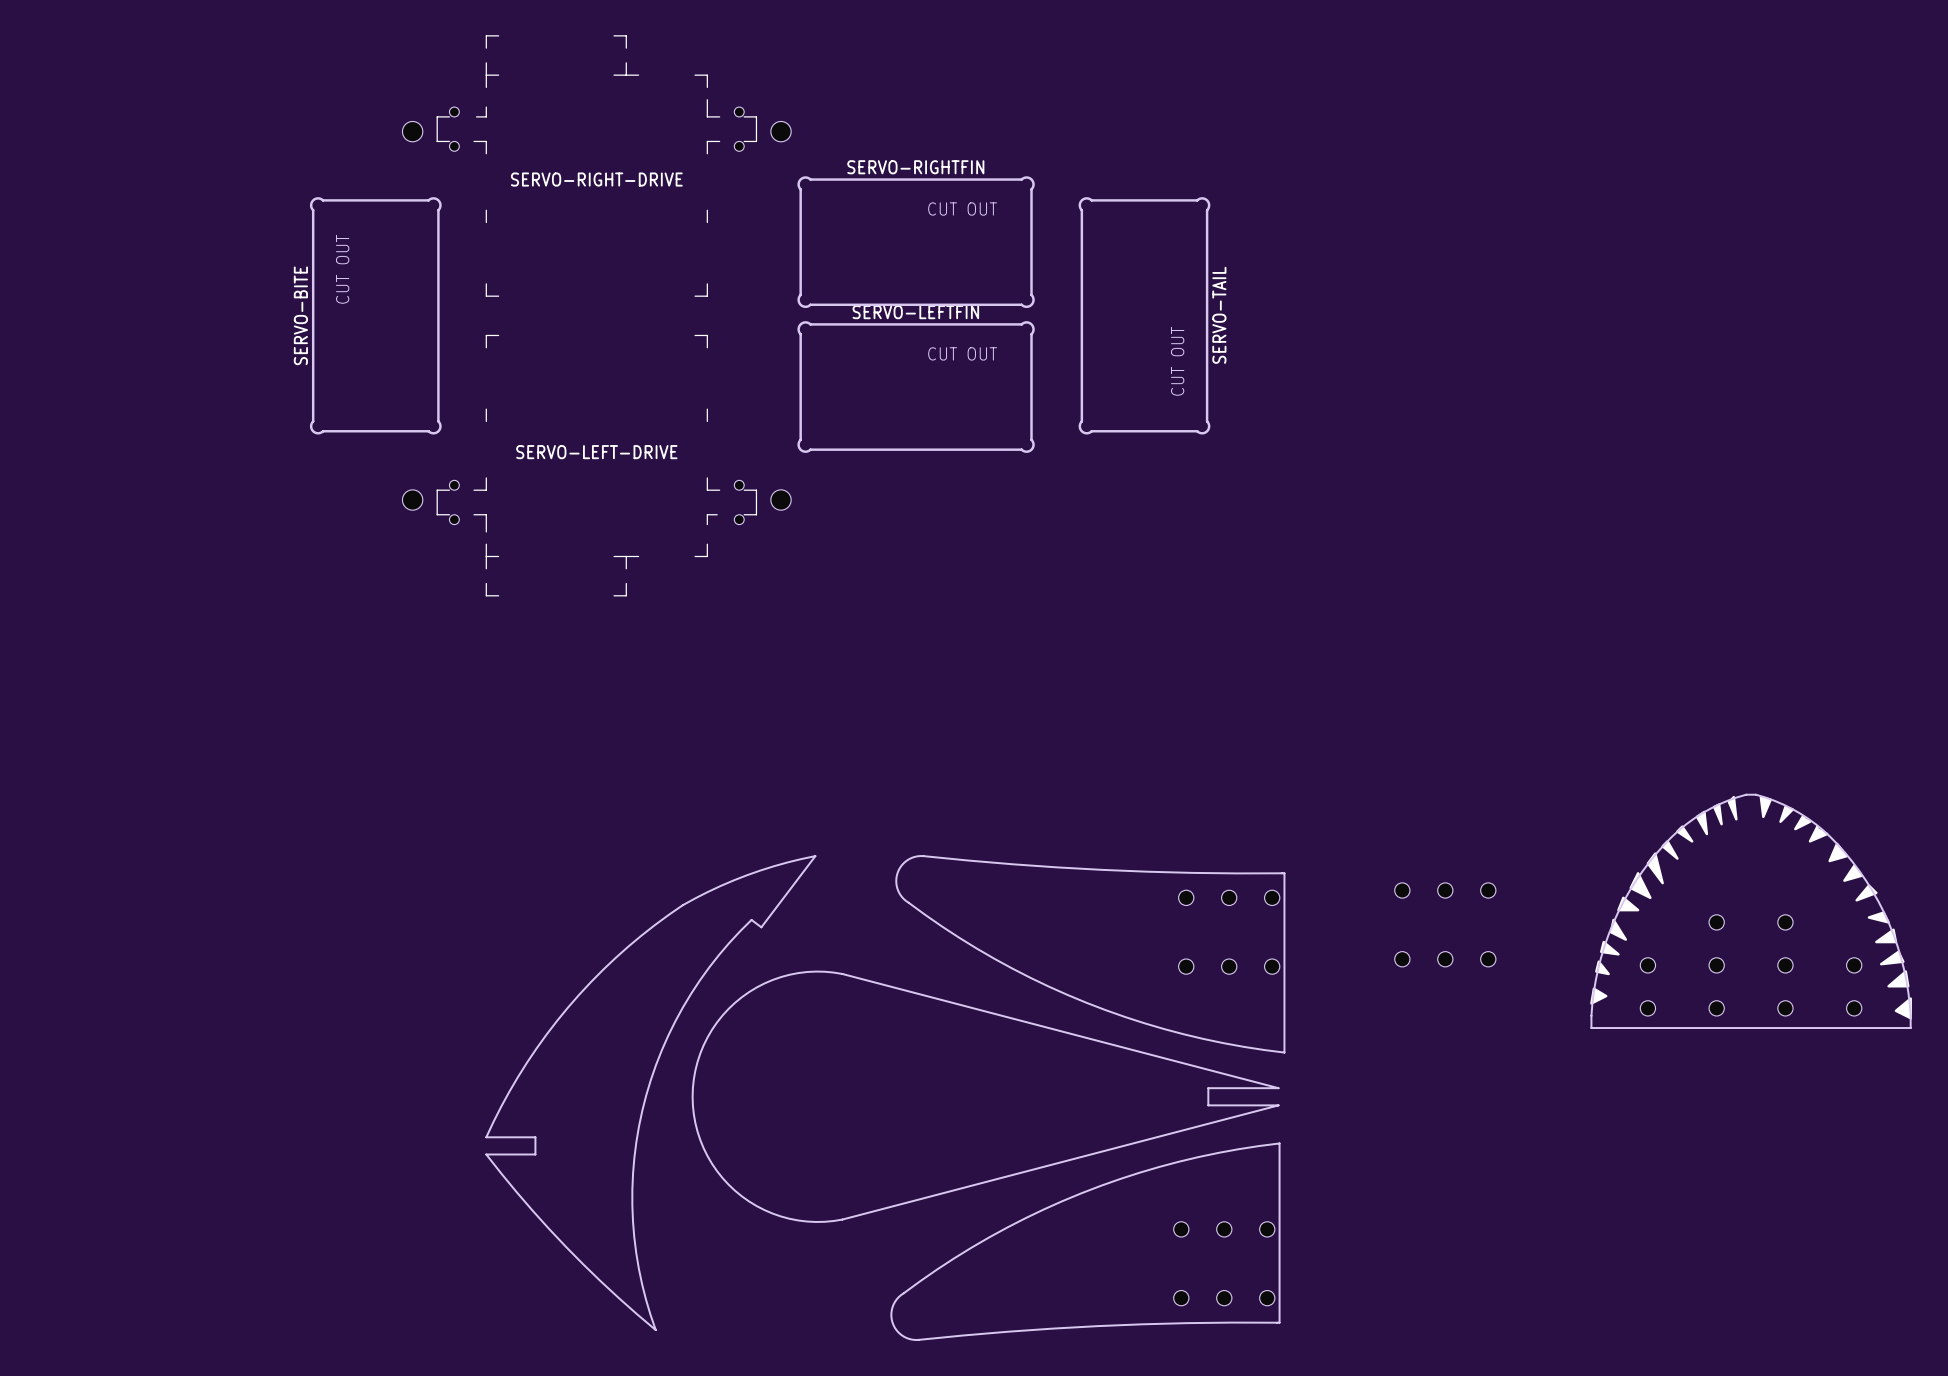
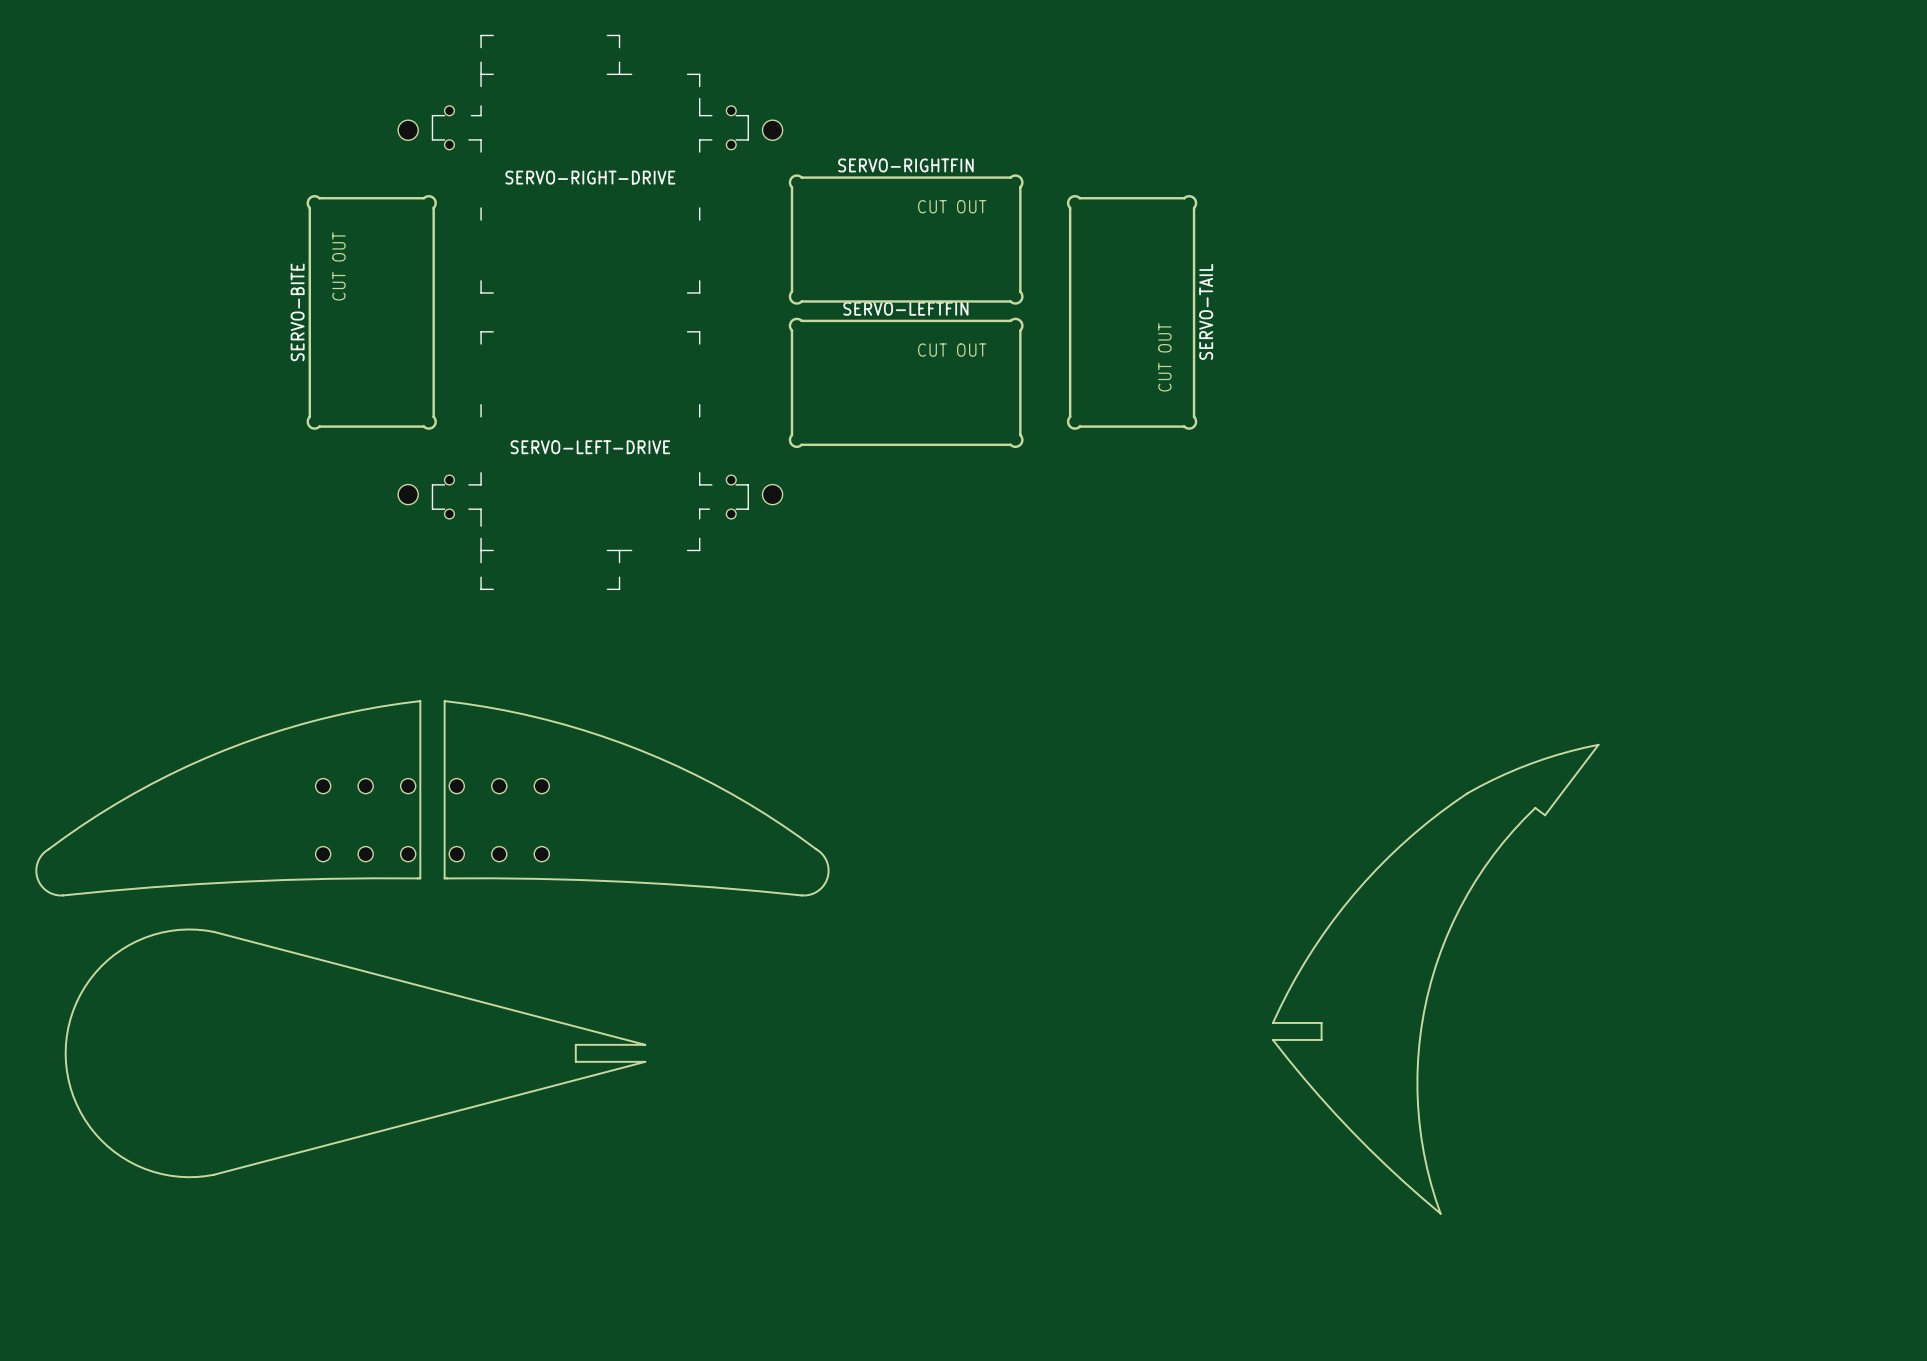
board edge: none -> (420, 701) (420, 878) (240, 881) (60, 895) (46, 890) (38, 881) (36, 866) (40, 857) (46, 850) (115, 804) (187, 766) (243, 743) (301, 724) (360, 710) (420, 701)
board edge: none -> (444, 701) (444, 878) (624, 881) (804, 895) (818, 890) (826, 881) (828, 866) (824, 857) (818, 850) (749, 804) (677, 766) (621, 743) (563, 724) (504, 710) (444, 701)
board edge: none -> (1598, 744) (1545, 815) (1535, 807) (1493, 854) (1459, 908) (1435, 966) (1421, 1027) (1417, 1090) (1423, 1152) (1440, 1213) (1386, 1165) (1351, 1131) (1303, 1077) (1272, 1039) (1321, 1039) (1321, 1022) (1272, 1022) (1304, 963) (1332, 920) (1365, 881) (1413, 834) (1467, 793) (1492, 780) (1544, 759) (1598, 744)
hole: none -> (323, 786)
hole: none -> (365, 786)
hole: none -> (408, 786)
hole: none -> (456, 786)
hole: none -> (499, 786)
hole: none -> (541, 786)
board edge: (1746, 794) (1755, 794) (1774, 800) (1808, 818) (1830, 836) (1859, 871) (1884, 912) (1897, 945) (1908, 992) (1910, 1028) (1591, 1028) (1593, 992) (1601, 957) (1613, 923) (1635, 881) (1657, 852) (1686, 824) (1710, 808) (1746, 794) -> none
drawing: [1595, 795, 1738, 976] -> none
drawing: [1759, 795, 1912, 1020] -> none
board edge: (815, 856) (761, 927) (751, 919) (709, 967) (675, 1021) (650, 1080) (636, 1141) (632, 1205) (638, 1268) (655, 1330) (600, 1281) (566, 1247) (517, 1192) (486, 1154) (535, 1154) (535, 1137) (486, 1137) (518, 1076) (546, 1034) (579, 994) (628, 946) (682, 905) (707, 891) (760, 870) (815, 856) -> none
board edge: (923, 856) (1102, 869) (1284, 873) (1284, 1052) (1203, 1039) (1144, 1023) (1086, 1002) (1012, 968) (959, 937) (901, 896) (896, 885) (898, 870) (908, 859) (923, 856) -> none
hole: none -> (323, 854)
hole: none -> (365, 854)
hole: none -> (408, 854)
hole: none -> (456, 854)
hole: none -> (499, 854)
hole: none -> (541, 854)
hole: (1402, 890) -> none
hole: (1445, 890) -> none
hole: (1488, 890) -> none
hole: (1186, 897) -> none
hole: (1229, 897) -> none
hole: (1272, 897) -> none
hole: (1716, 922) -> none
hole: (1785, 922) -> none
board edge: none -> (213, 931) (645, 1044) (575, 1044) (575, 1061) (645, 1061) (213, 1174) (187, 1177) (153, 1171) (129, 1161) (114, 1151) (101, 1140) (84, 1119) (76, 1104) (68, 1079) (65, 1053) (68, 1027) (76, 1002) (89, 979) (101, 966) (121, 949) (144, 937) (161, 932) (187, 929) (213, 931)
hole: (1402, 959) -> none
hole: (1445, 959) -> none
hole: (1488, 959) -> none
hole: (1647, 965) -> none
hole: (1716, 965) -> none
hole: (1785, 965) -> none
hole: (1854, 965) -> none
hole: (1186, 966) -> none
hole: (1229, 966) -> none
hole: (1272, 966) -> none
board edge: (842, 973) (1278, 1088) (1208, 1088) (1208, 1105) (1278, 1105) (842, 1219) (815, 1221) (781, 1216) (756, 1206) (741, 1196) (728, 1184) (712, 1163) (703, 1148) (695, 1123) (692, 1096) (695, 1070) (703, 1045) (717, 1022) (728, 1008) (749, 992) (772, 979) (789, 974) (815, 971) (842, 973) -> none
drawing: [1590, 987, 1608, 1005] -> none
hole: (1647, 1008) -> none
hole: (1716, 1008) -> none
hole: (1785, 1008) -> none
hole: (1854, 1008) -> none
board edge: (1279, 1143) (1279, 1322) (1097, 1326) (915, 1339) (901, 1334) (893, 1325) (891, 1310) (895, 1301) (901, 1294) (971, 1247) (1044, 1209) (1100, 1185) (1159, 1166) (1218, 1152) (1279, 1143) -> none
hole: (1181, 1229) -> none
hole: (1224, 1229) -> none
hole: (1267, 1229) -> none
hole: (1181, 1298) -> none
hole: (1224, 1298) -> none
hole: (1267, 1298) -> none

